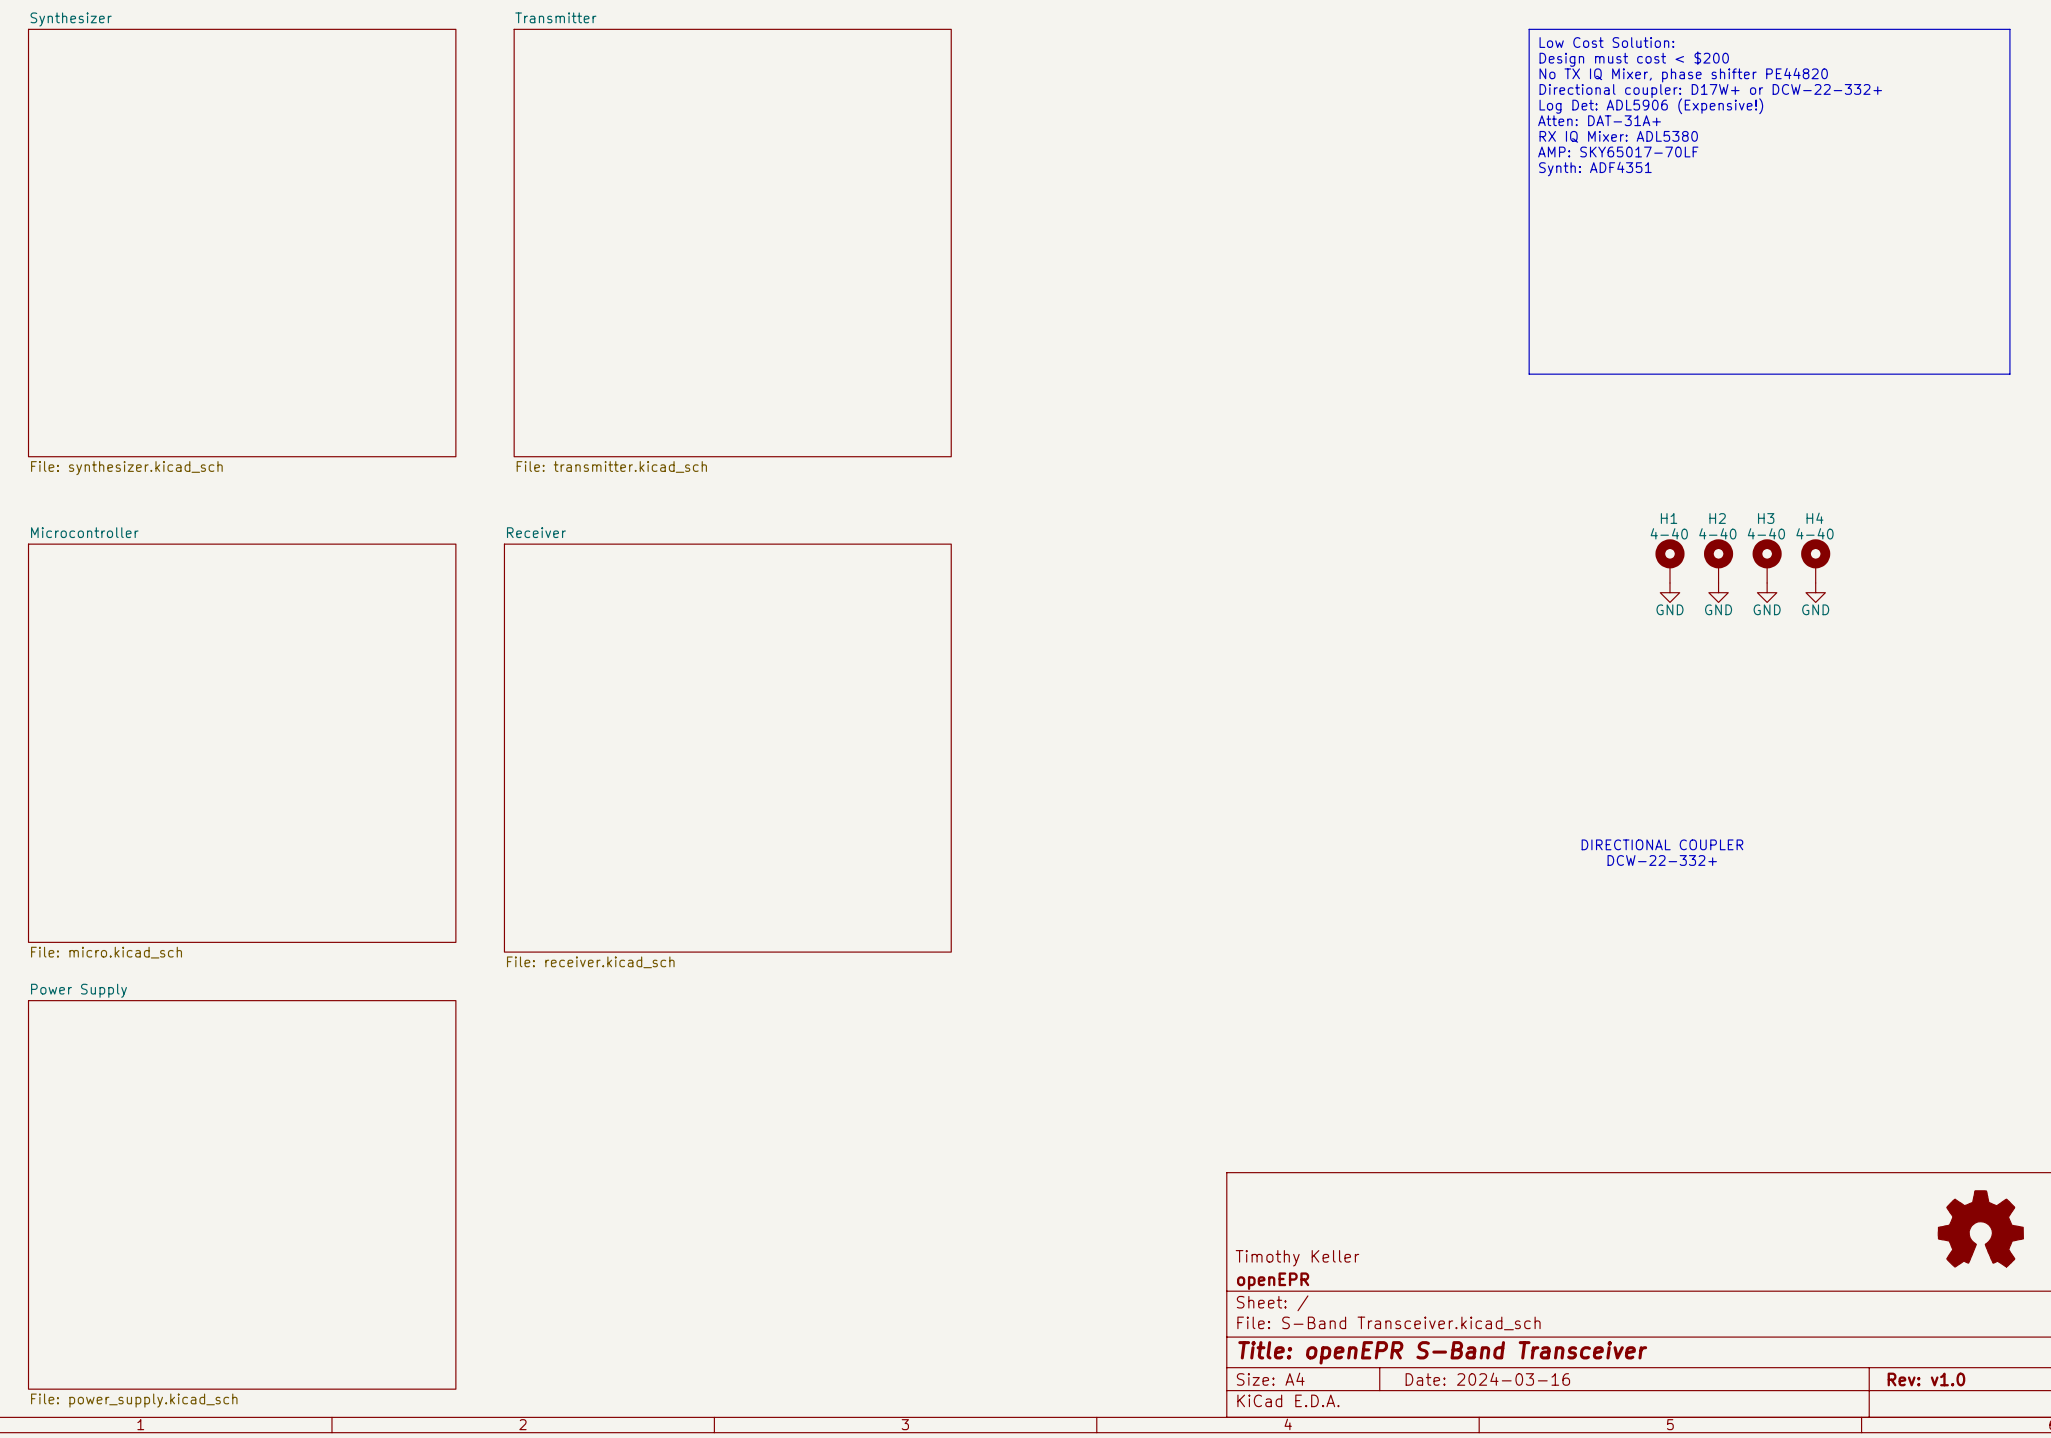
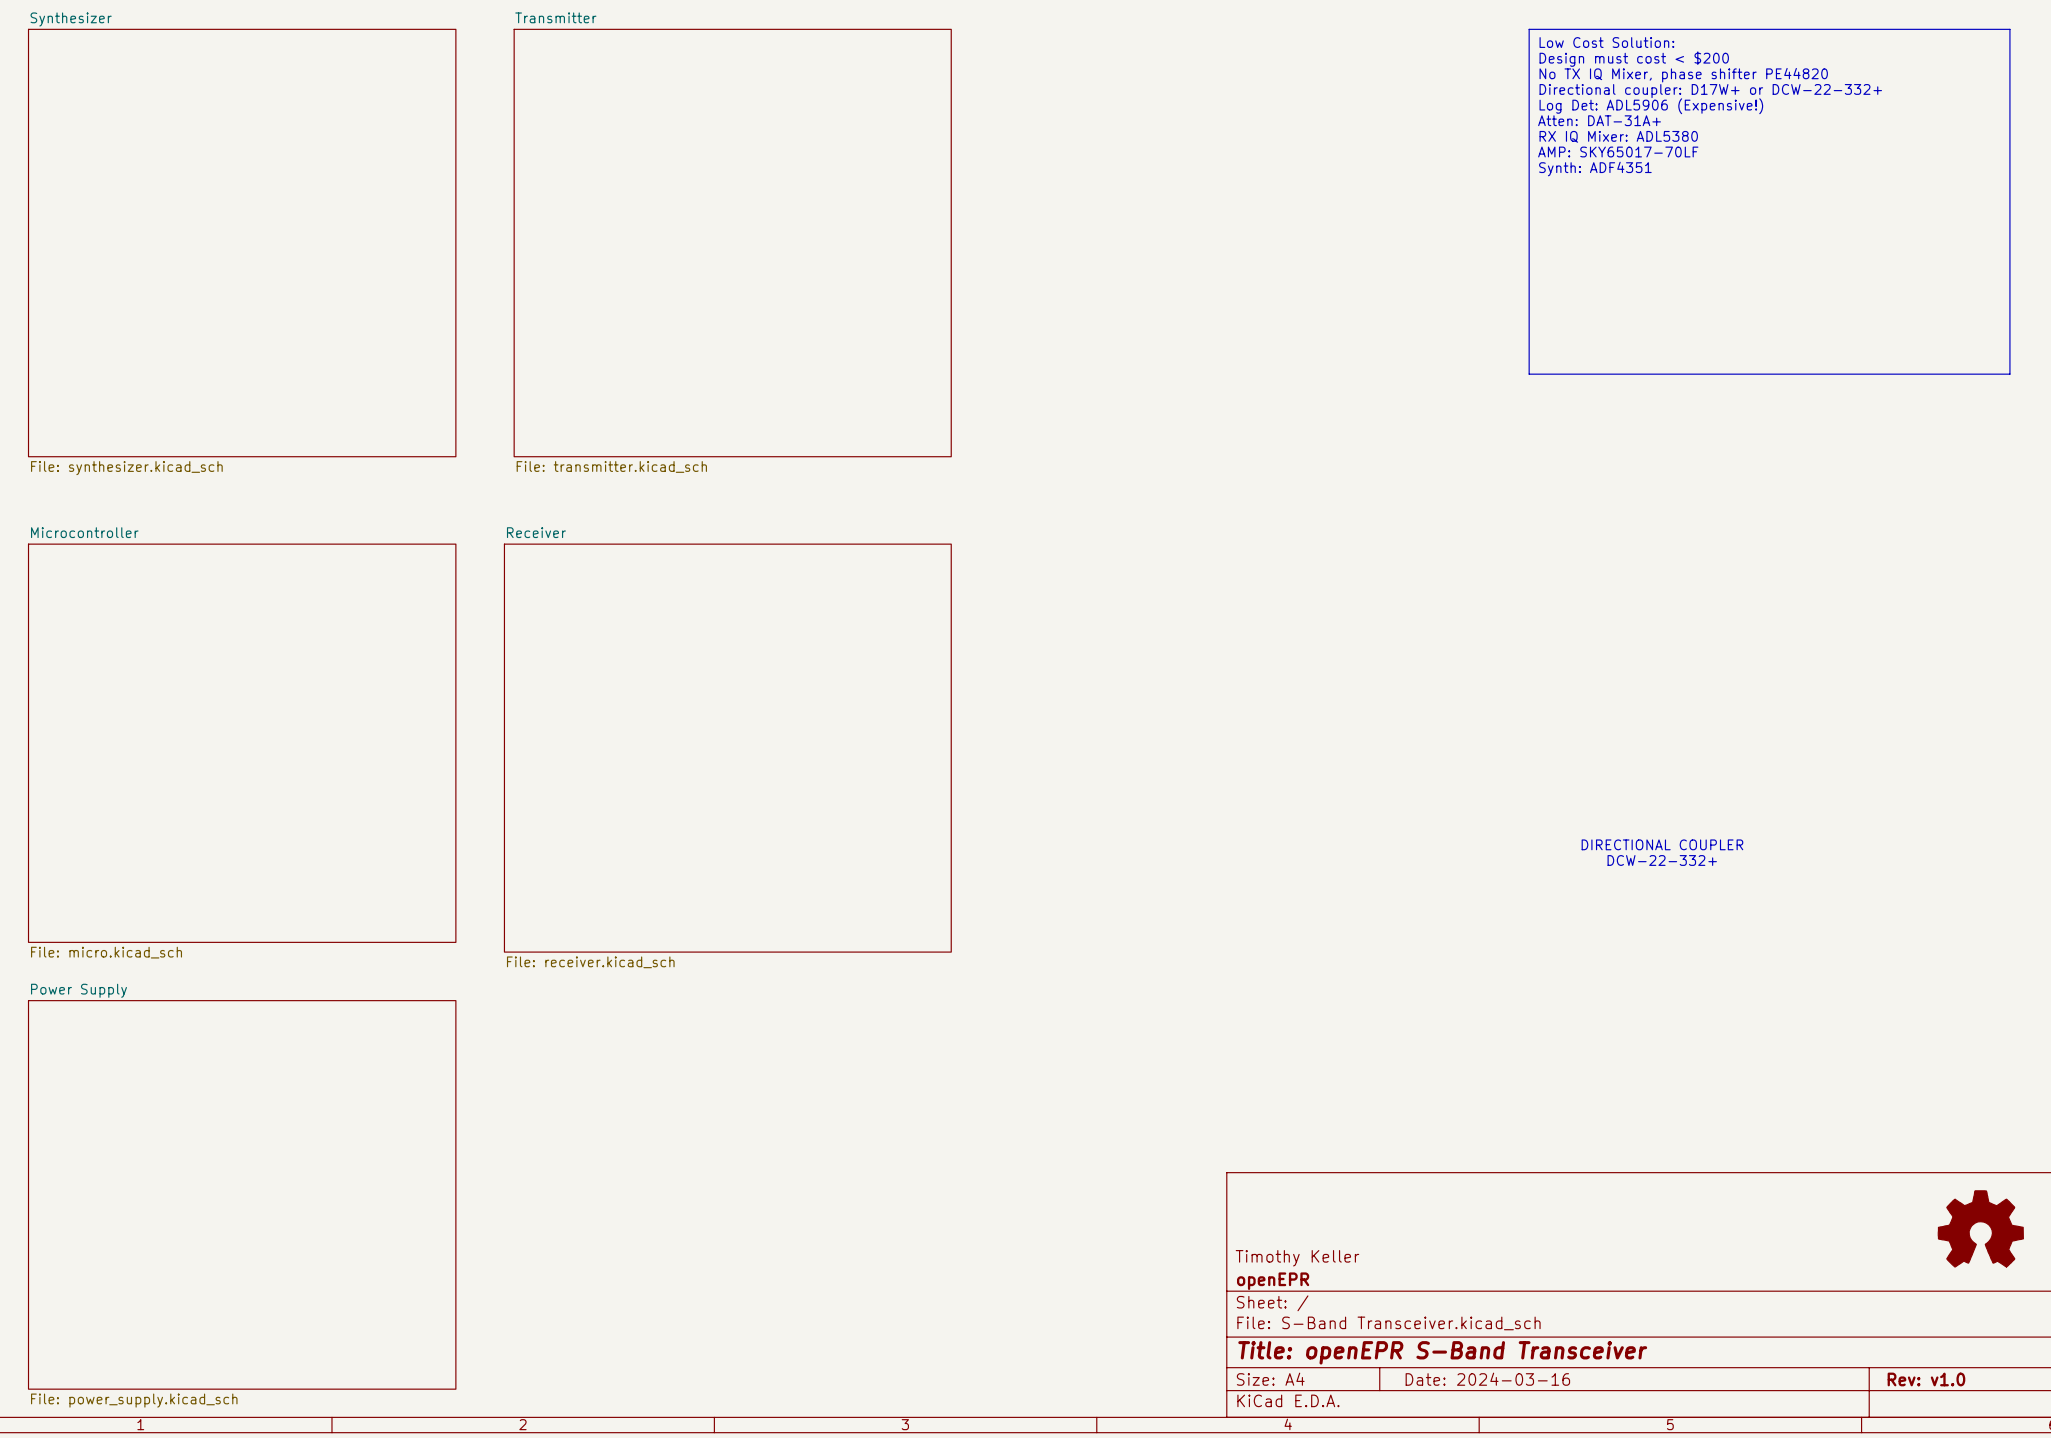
H1: 4-40 (1669, 561) -> none
H2: 4-40 (1718, 561) -> none
H3: 4-40 (1767, 561) -> none
H4: 4-40 (1815, 561) -> none
power symbol: GND (1669, 592) -> none
power symbol: GND (1718, 592) -> none
power symbol: GND (1767, 592) -> none
power symbol: GND (1815, 592) -> none

